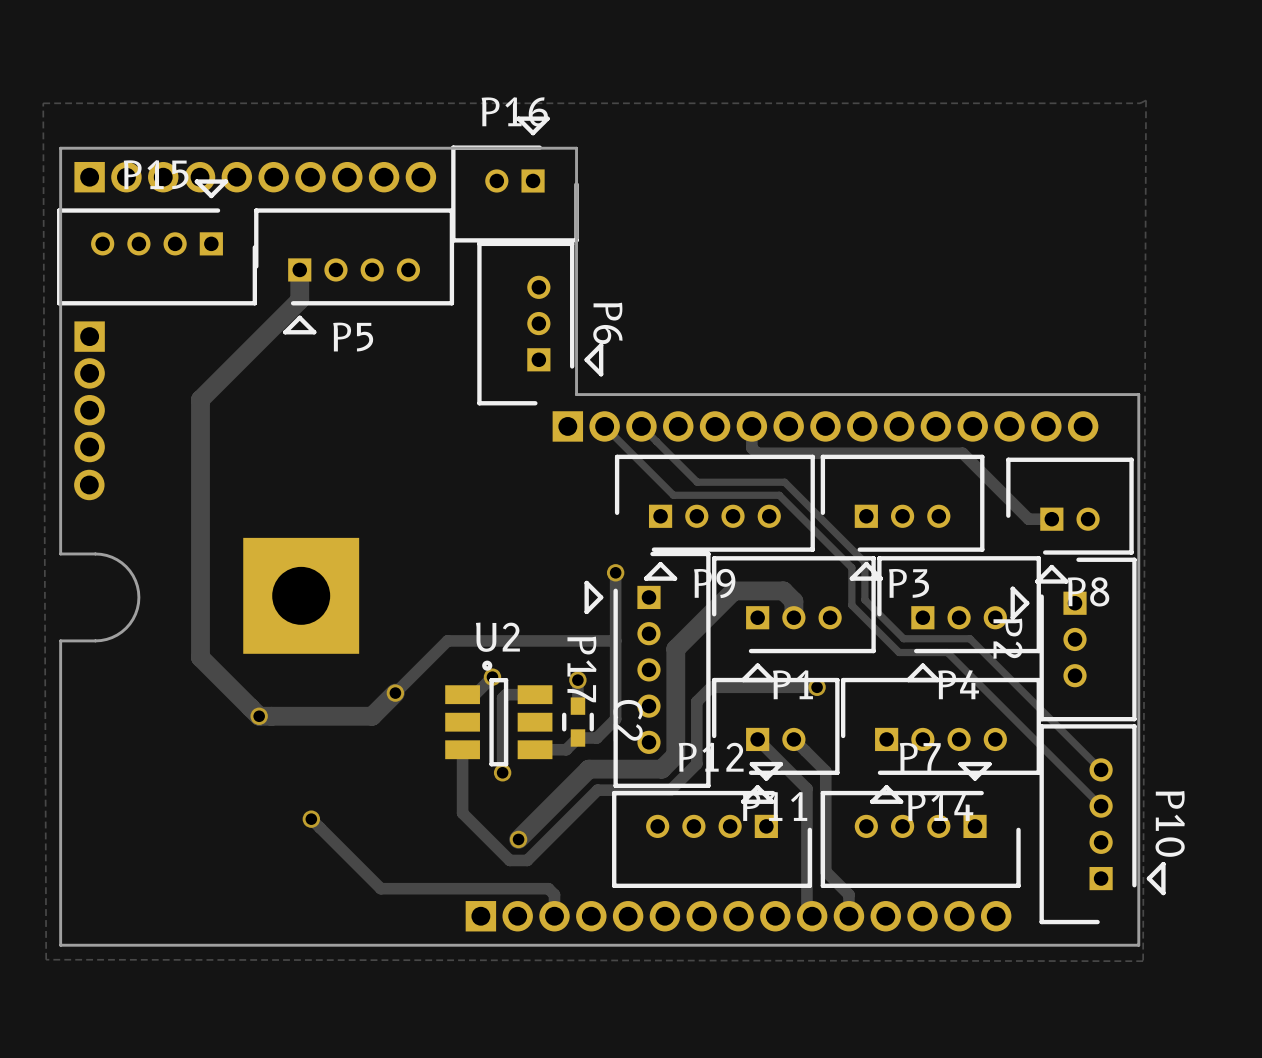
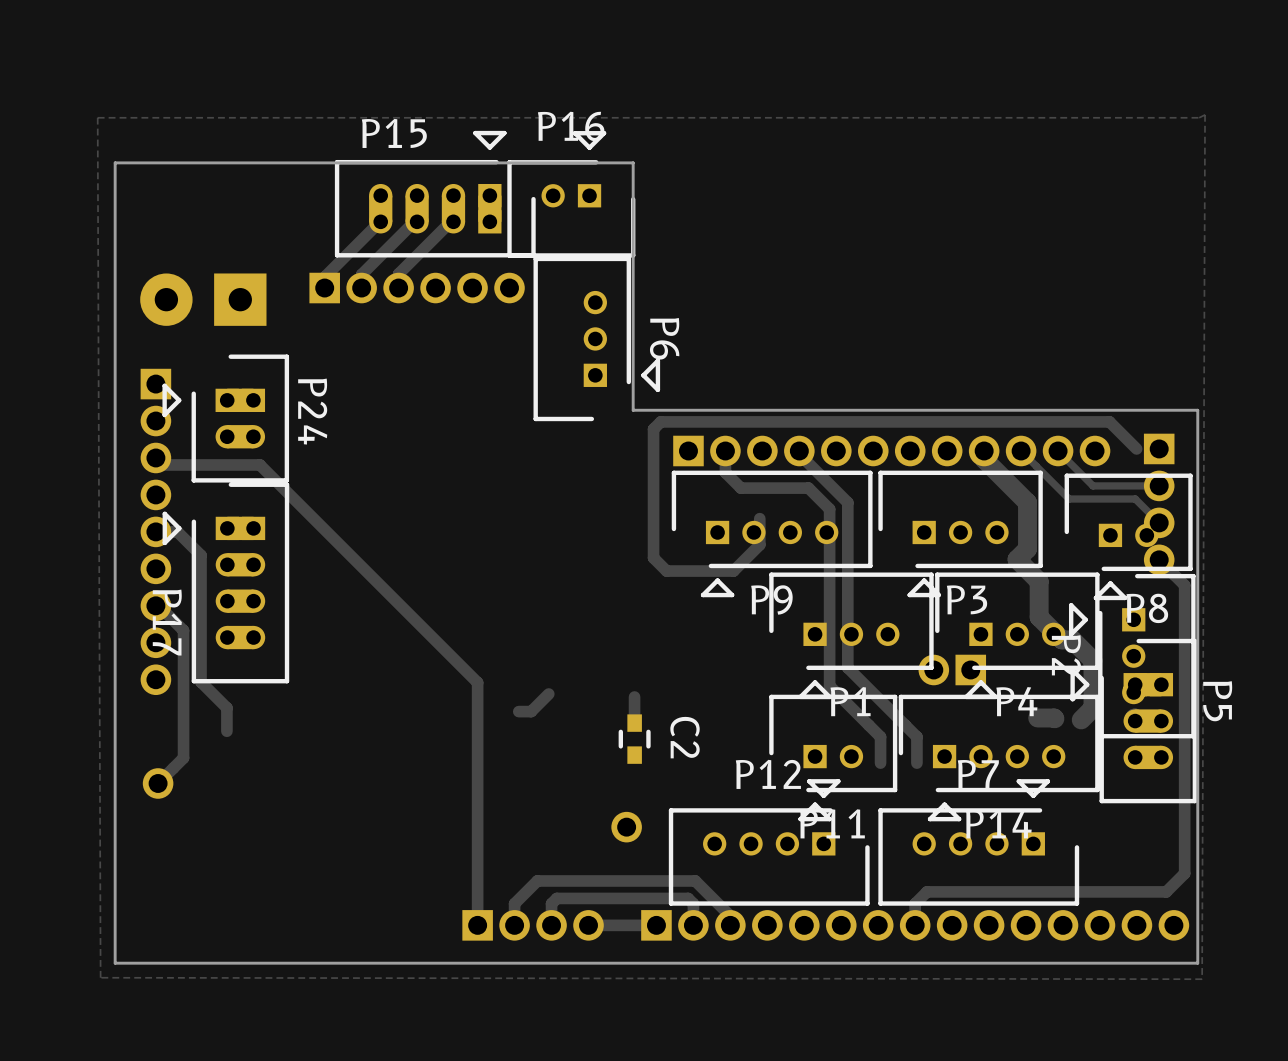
part: (255, 177) -> none
P15 footprint: [57, 179, 258, 306] -> [334, 130, 536, 258]
track: none -> (380, 195) (380, 221) (324, 277) (324, 288)
track: none -> (417, 195) (417, 219) (361, 274) (361, 288)
track: none -> (453, 195) (453, 219) (398, 274) (398, 288)
P5 footprint: [254, 208, 455, 335] -> [1070, 638, 1198, 804]
track: (299, 269) (299, 300) (200, 399) (200, 657) (259, 716) (372, 716) (447, 640) (615, 640) -> none
part: none -> (417, 288)
part: none -> (203, 299)
P5 name position: P5 (353, 337) -> P5 (1217, 701)
P24: none -> (225, 418)
part: (89, 410) -> none
part footprint: [552, 411, 1099, 442] -> [673, 435, 1111, 467]
track: (604, 426) (673, 495) (779, 495) (851, 567) (851, 605) (899, 652) (947, 652) (1101, 806) -> none
track: (641, 426) (697, 482) (784, 482) (864, 562) (864, 599) (903, 638) (969, 638) (1101, 769) -> none
track: (751, 426) (751, 447) (757, 453) (962, 453) (1028, 519) (1051, 519) -> none
track: none -> (1136, 448) (1109, 421) (660, 421) (653, 429) (653, 557) (666, 571) (733, 571) (759, 544) (759, 518)
track: none -> (725, 451) (725, 472) (740, 488) (808, 488) (829, 509) (829, 686) (880, 736) (880, 763)
track: none -> (799, 451) (799, 454) (847, 502) (847, 667) (916, 736) (916, 763)
track: none -> (984, 451) (984, 459) (1027, 502) (1027, 548) (1017, 559) (1039, 581) (1039, 617) (1061, 639) (1072, 639) (1092, 660) (1092, 708) (1081, 719)
track: none -> (1021, 451) (1069, 499) (1135, 499) (1159, 522)
track: none -> (1058, 451) (1092, 485) (1159, 485)
track: none -> (155, 458) (162, 464) (259, 464) (477, 682) (477, 925)
part: none -> (1159, 504)
track: none -> (155, 531) (177, 531) (201, 555) (201, 682) (226, 707) (226, 731)
part: none -> (155, 531)
track: none -> (1159, 559) (1184, 585) (1184, 873) (1166, 891) (927, 891) (915, 903) (915, 925)
P17 footprint: [584, 551, 711, 789] -> [162, 482, 290, 684]
board edge: (60, 553) (101, 554) (117, 559) (133, 575) (138, 597) (133, 619) (117, 635) (101, 640) (60, 640) -> (115, 570) (115, 657)
track: (615, 572) (615, 719) (596, 738) (577, 738) (566, 749) (535, 749) -> none
via: (615, 572) -> none
track: none -> (158, 605) (183, 630) (183, 758) (158, 783)
part: (301, 595) -> none
track: (793, 617) (793, 601) (783, 590) (733, 590) (675, 649) (675, 755) (661, 769) (588, 769) (518, 839) -> none
part: none -> (952, 669)
via: (492, 677) -> none
via: (577, 680) -> none
track: (817, 687) (711, 687) (696, 701) (696, 763) (670, 790) (597, 790) (527, 860) (509, 860) (462, 813) (462, 749) -> none
via: (817, 687) -> none
via: (395, 693) -> none
track: (535, 694) (506, 694) (502, 698) (502, 772) -> none
track: none -> (1037, 718) (1054, 718)
U2: (498, 713) -> none
via: (259, 716) -> none
track: (757, 739) (806, 788) (806, 911) (812, 916) -> none
track: (793, 739) (825, 771) (825, 871) (848, 894) (848, 916) -> none
part: none -> (158, 783)
via: (502, 772) -> none
part: none -> (626, 827)
track: (311, 819) (380, 888) (548, 888) (554, 894) (554, 916) -> none
via: (311, 819) -> none
P10: (1102, 824) -> none
via: (518, 839) -> none
part: none -> (533, 925)
track: none -> (656, 925) (588, 925)
track: none -> (693, 925) (693, 903) (688, 898) (556, 898) (551, 903) (551, 925)
track: none -> (730, 925) (730, 916) (695, 880) (537, 880) (514, 903) (514, 925)
part position: (738, 916) -> (915, 925)

